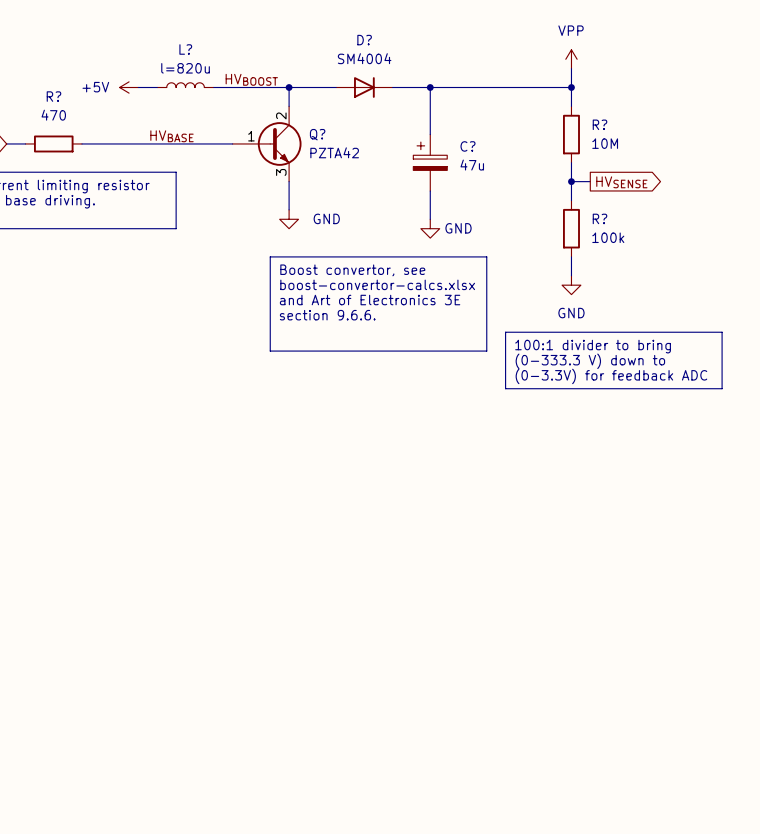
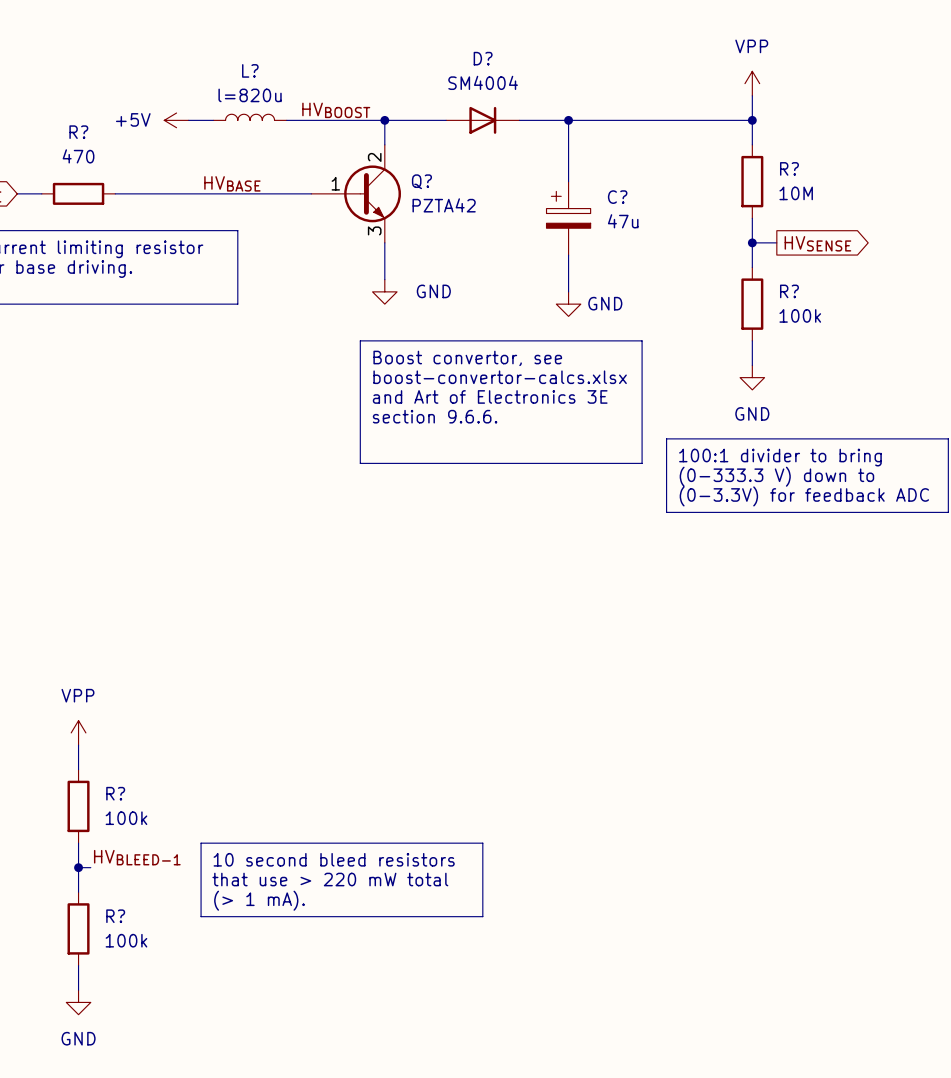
power symbol: none -> VPP (78, 732)
wire: none -> (78, 745) (78, 769)
R?: none -> 100k (78, 806)
wire: none -> (78, 843) (78, 892)
line: none -> (201, 843) (482, 843) (482, 916) (201, 916) (201, 843)
label: none -> HVBLEED-1 (137, 857)
text: none -> 10 second bleed resistors (334, 859)
wire: none -> (78, 867) (90, 867)
junction: none -> (78, 867)
text: none -> that use > 220 mW total (330, 879)
text: none -> (> 1 mA). (259, 900)
R?: none -> 100k (78, 928)
wire: none -> (78, 965) (78, 990)
power symbol: none -> GND (78, 1002)

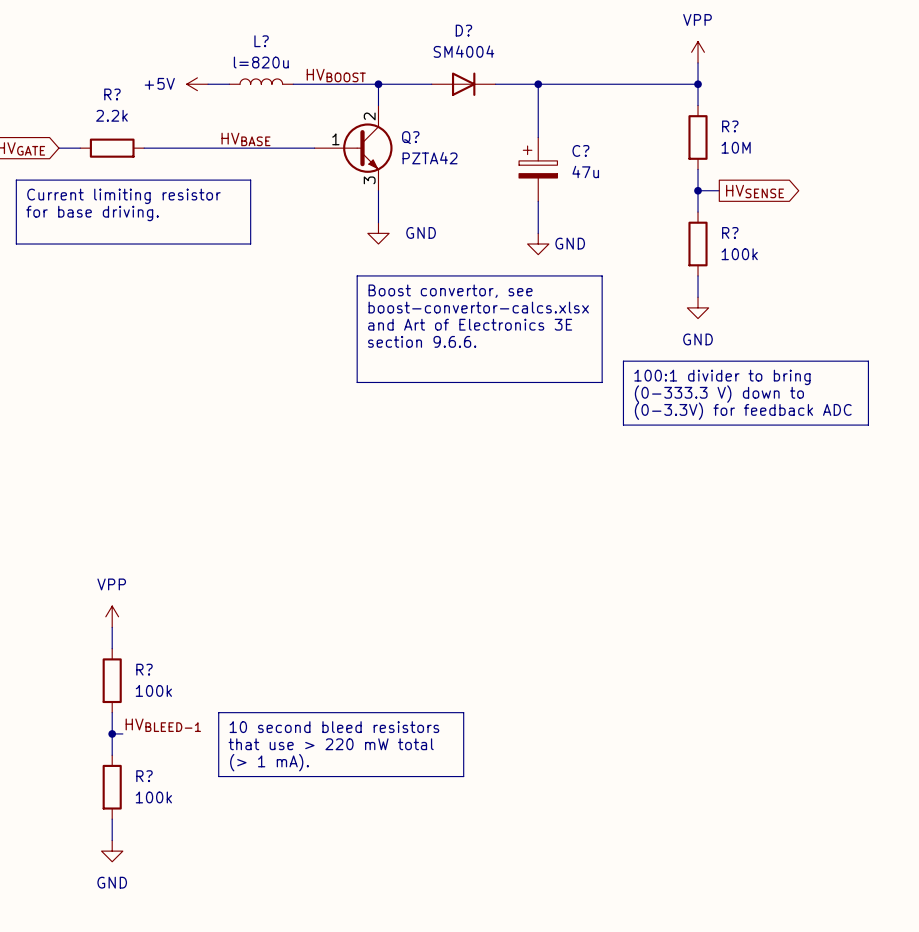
R? value: 470 (78, 156) -> 2.2k (111, 115)

